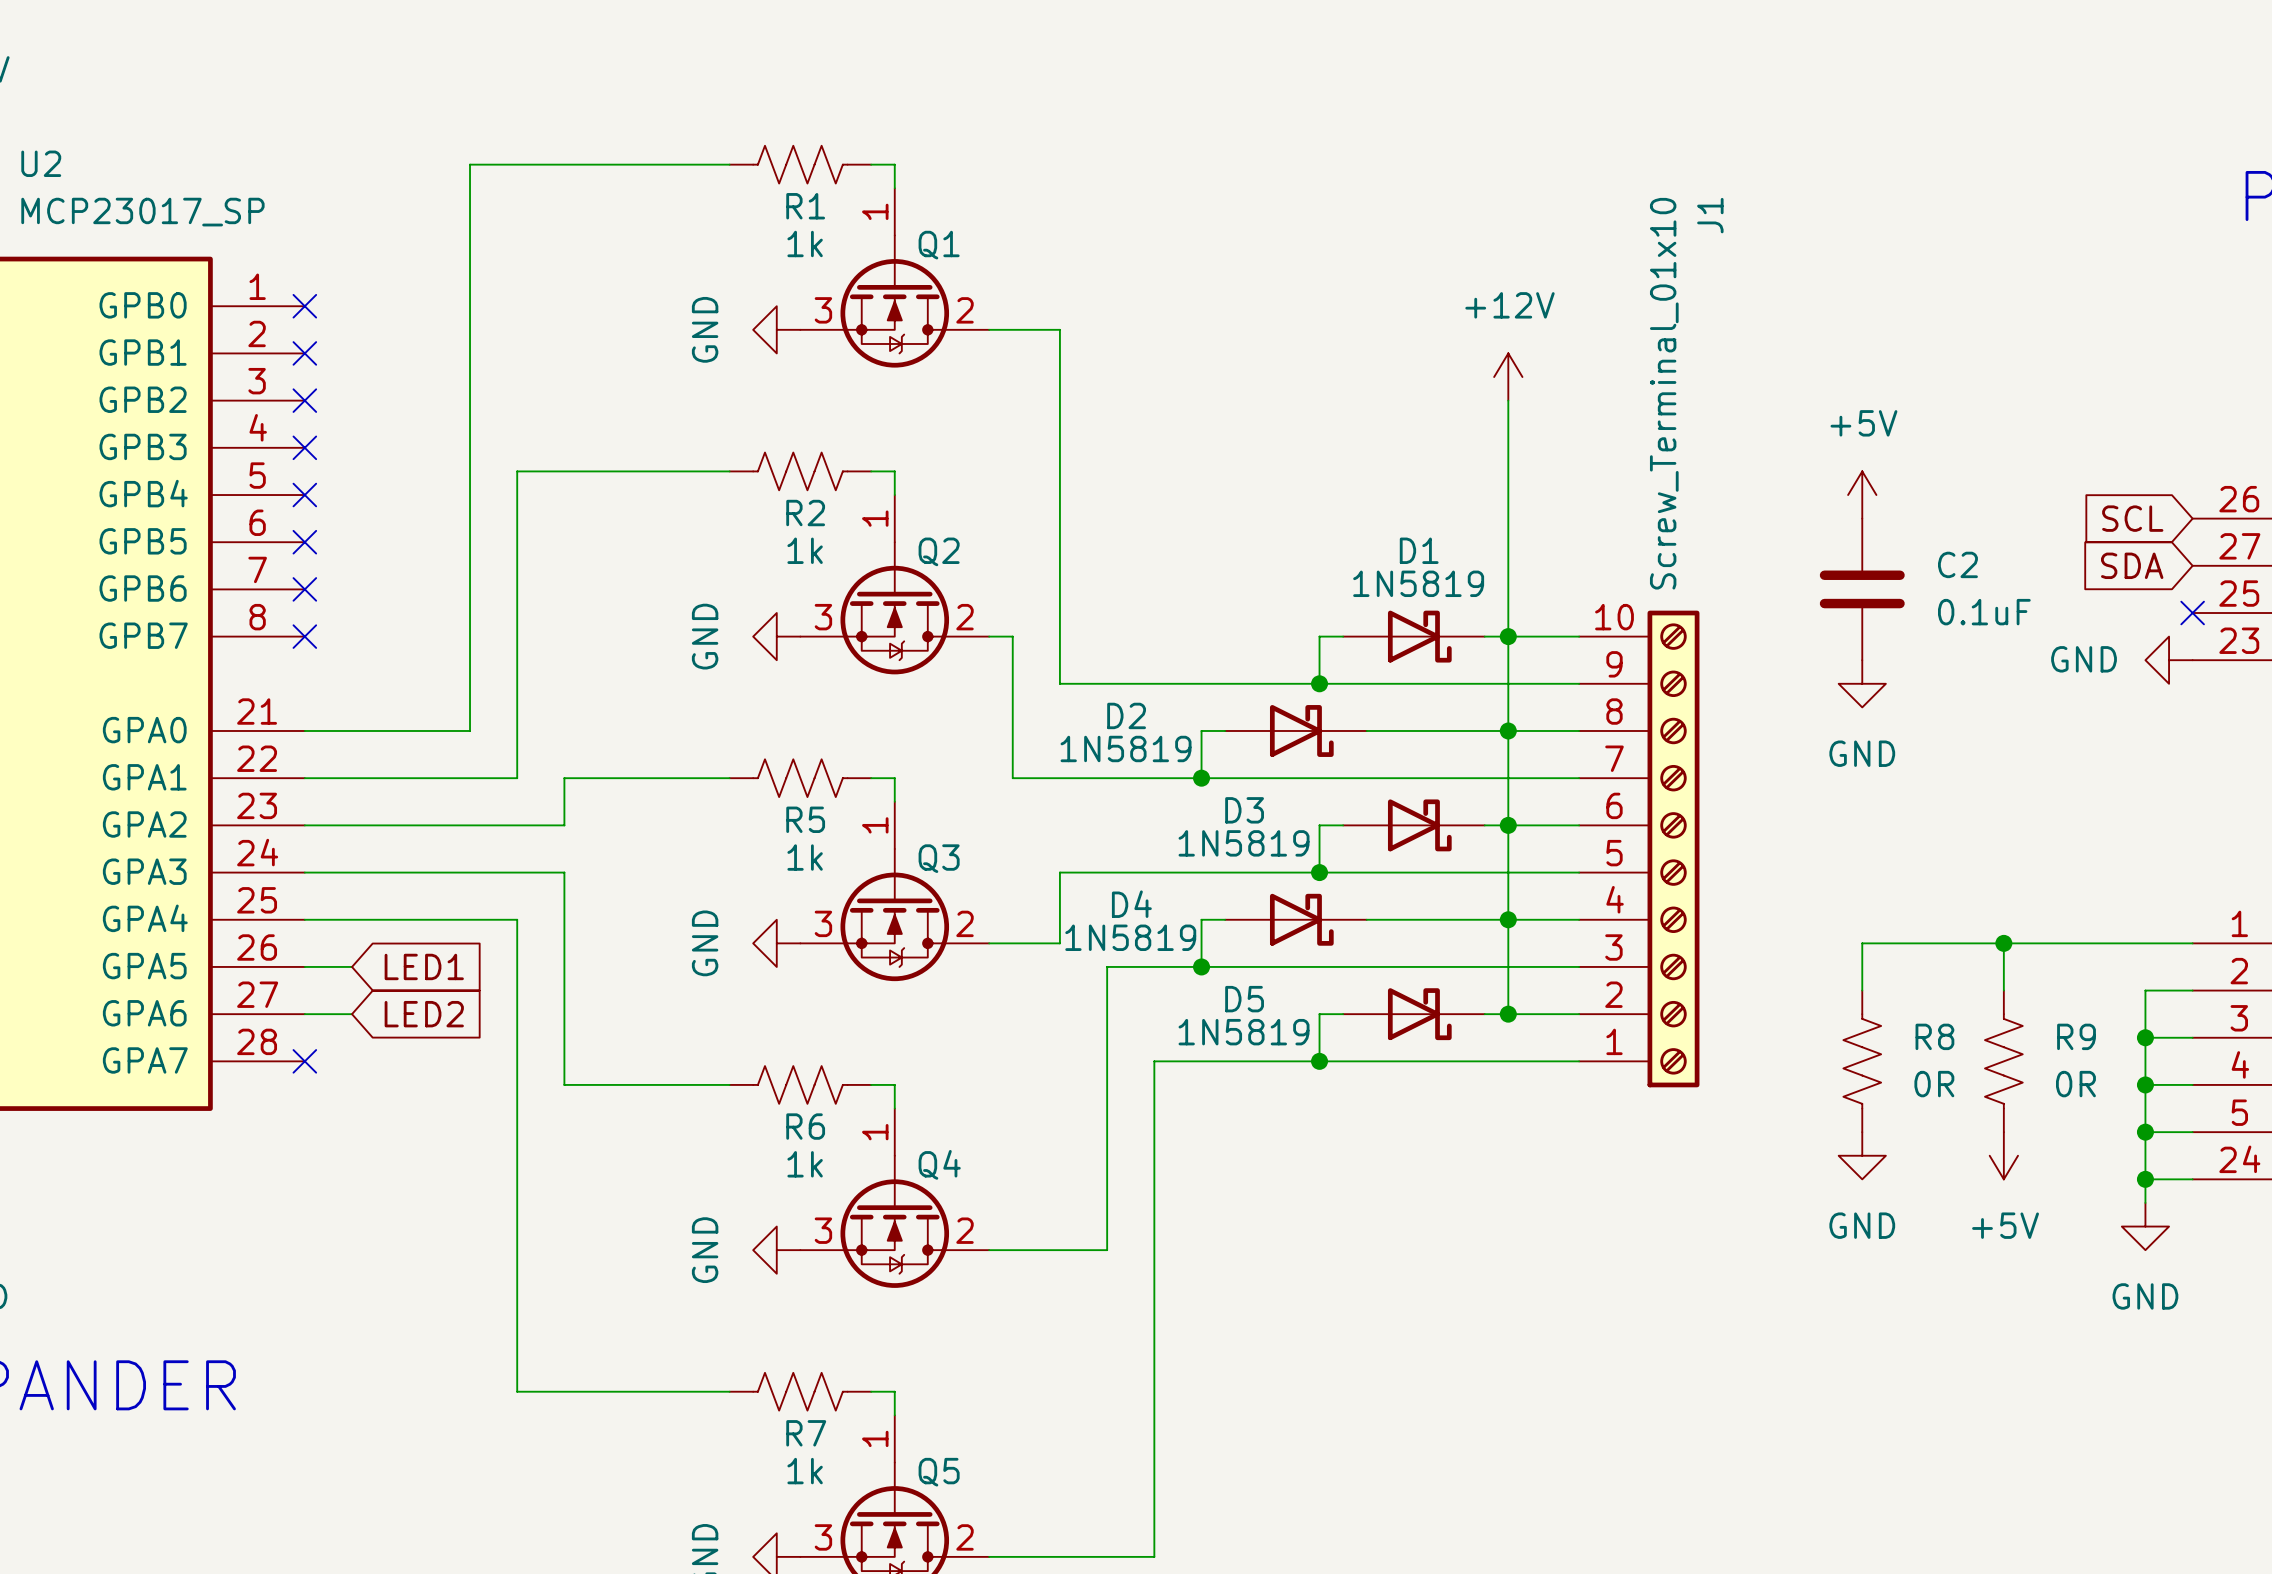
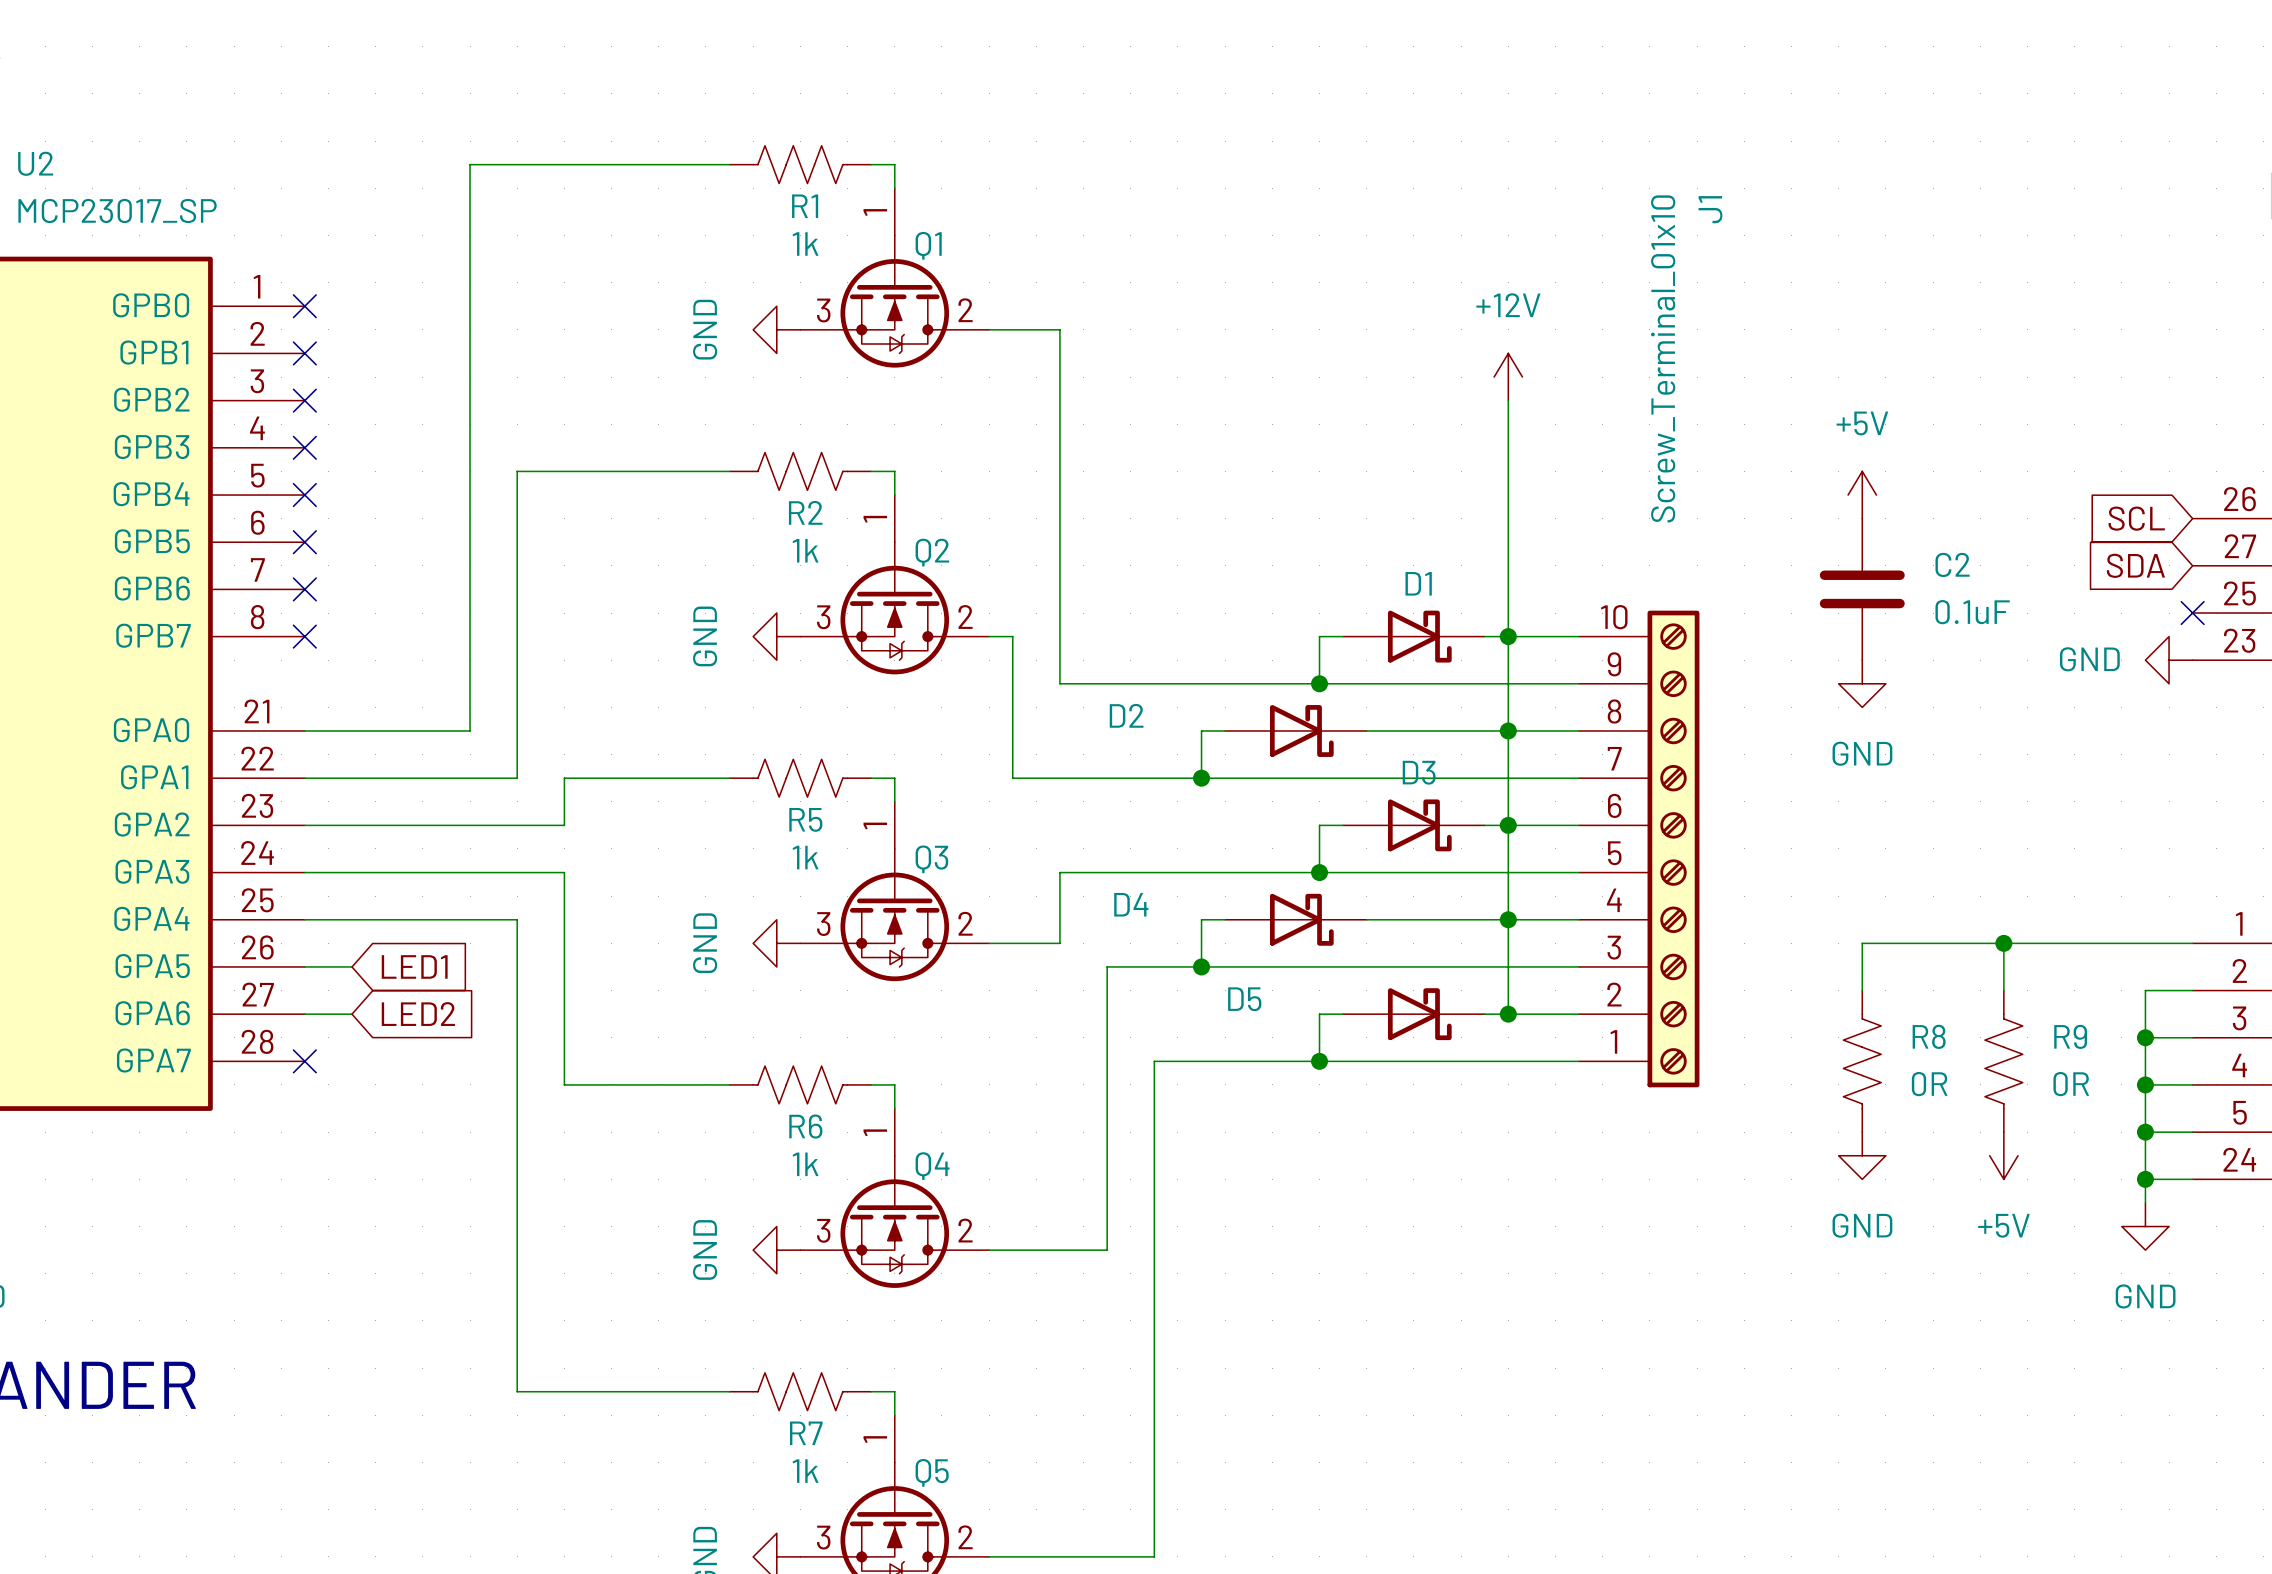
D1 name position: D1 (1419, 550) -> D1 (1418, 583)
D1 value: 1N5819 (1418, 583) -> none
D2 value: 1N5819 (1126, 748) -> none
D3 name position: D3 (1244, 810) -> D3 (1419, 772)
D3 value: 1N5819 (1244, 843) -> none
D4 value: 1N5819 (1130, 937) -> none
D5 value: 1N5819 (1244, 1032) -> none

